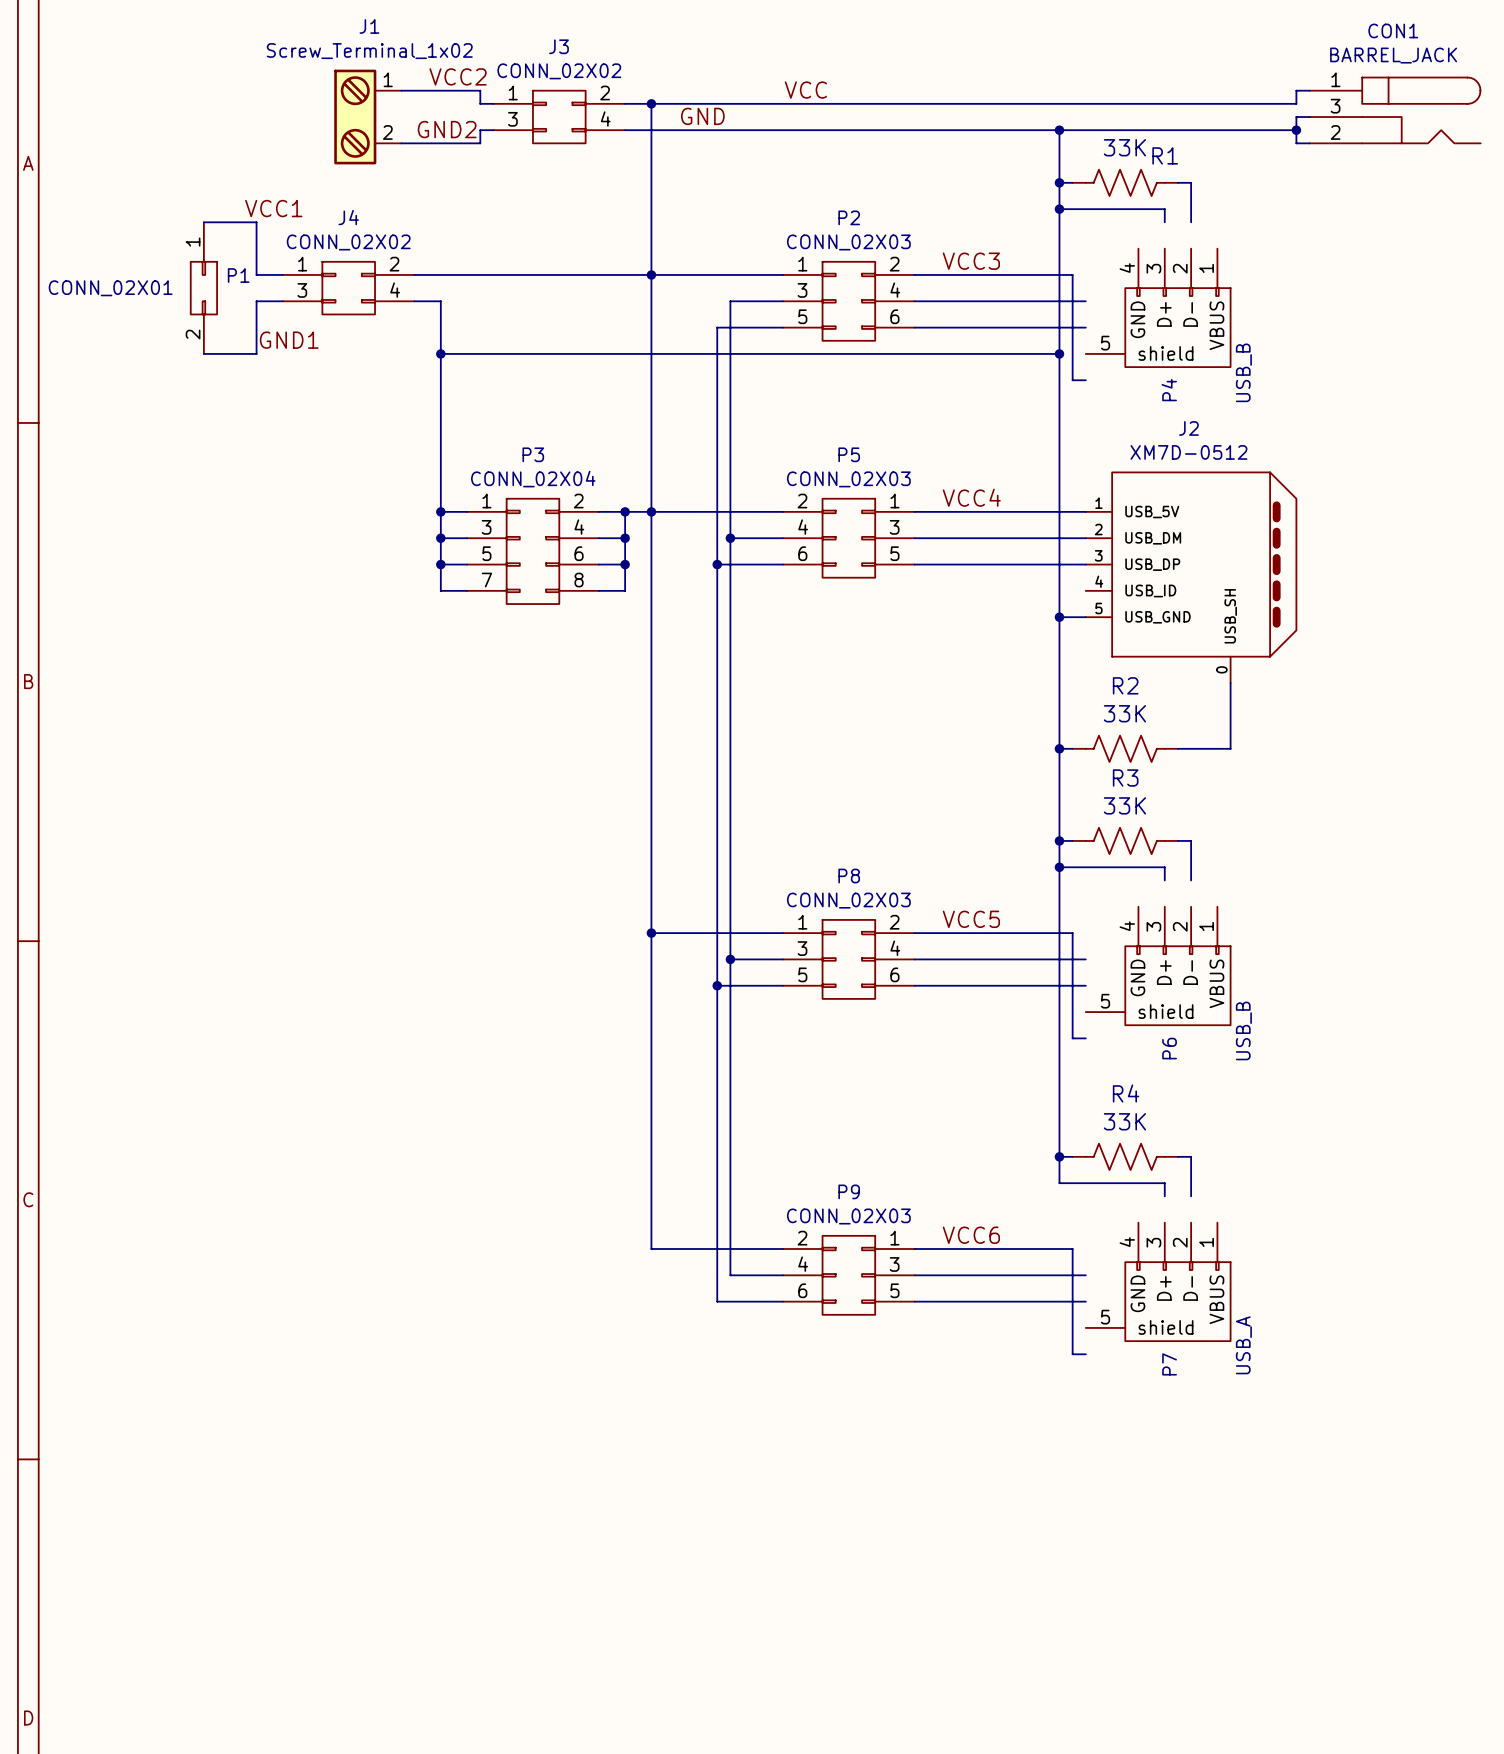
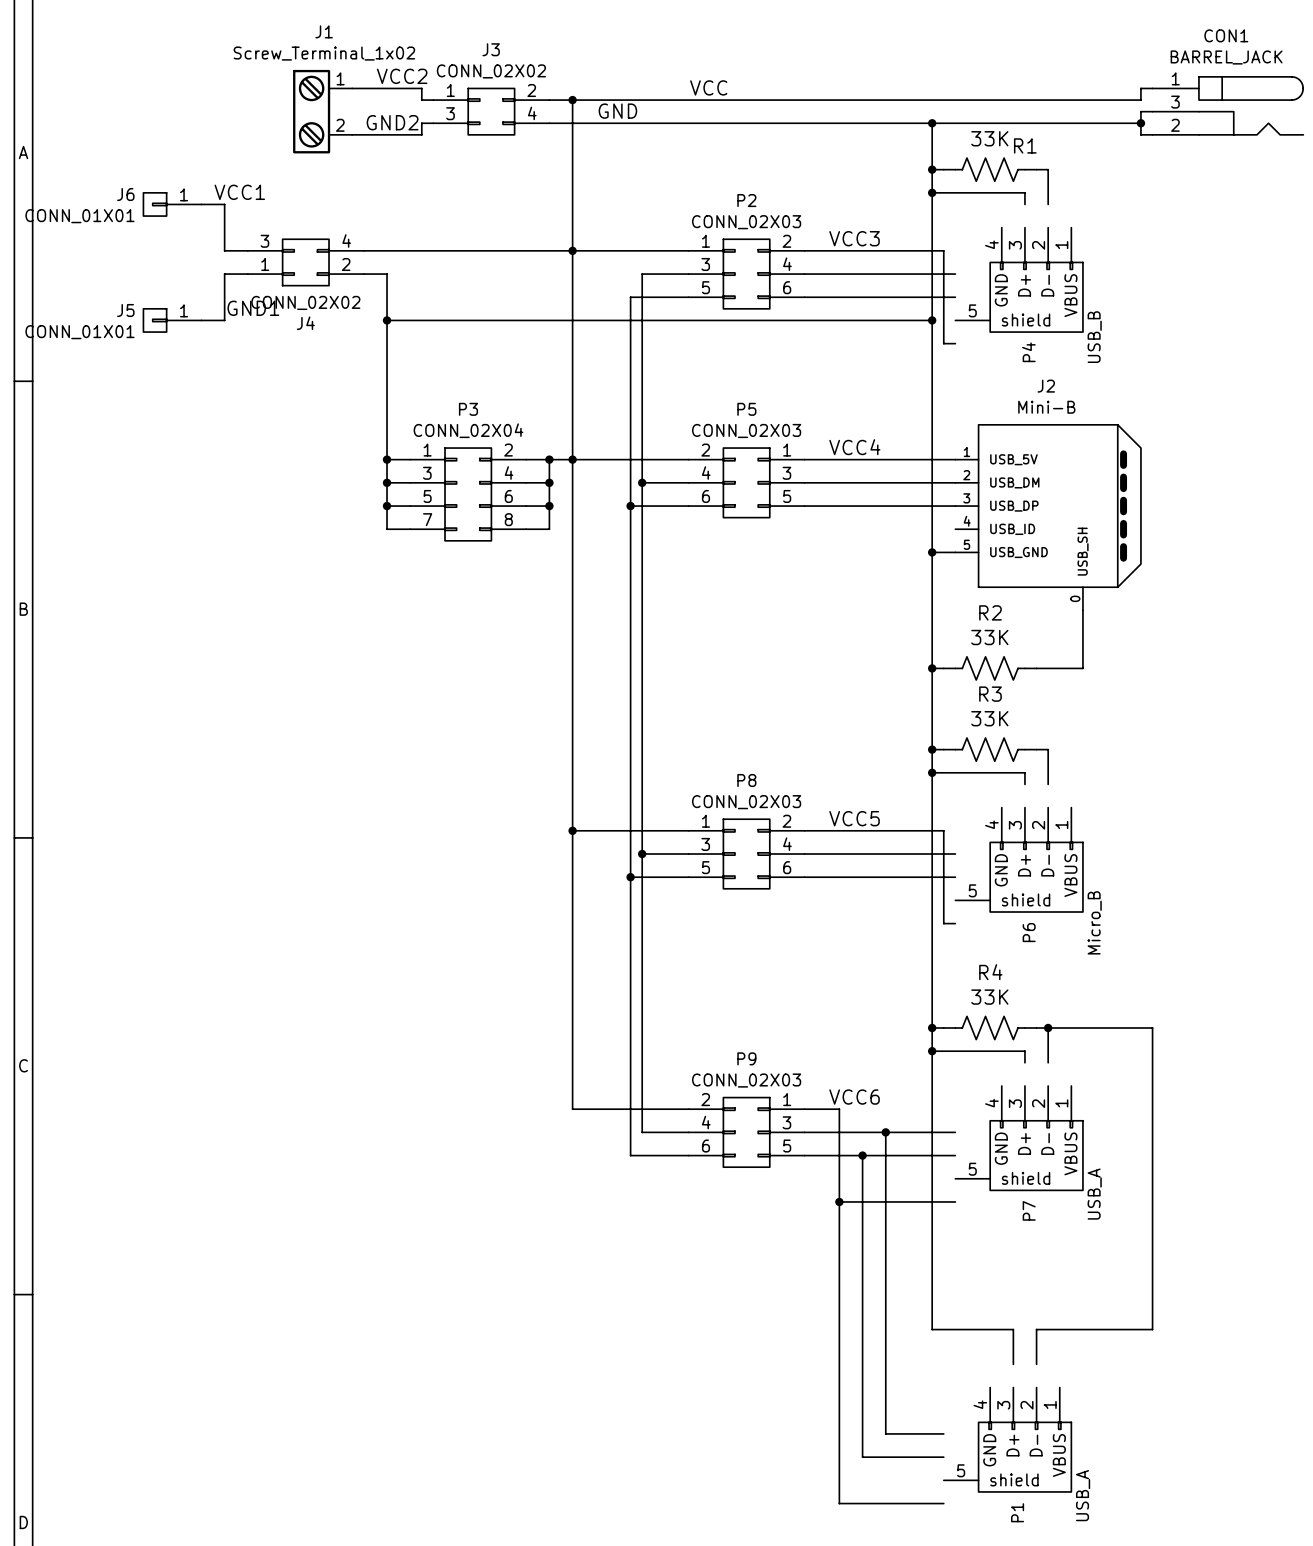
P1 symbol: [190, 222, 218, 354] -> [943, 1387, 1072, 1492]
J6: none -> CONN_01X01 (172, 204)
P1 name position: P1 (238, 275) -> P1 (1017, 1512)
P1 value: CONN_02X01 (110, 288) -> USB_A (1083, 1495)
J4 flip: as is (348, 288) -> up-down (305, 262)
J5: none -> CONN_01X01 (172, 320)
J2 value: XM7D-0512 (1188, 452) -> Mini-B (1046, 407)
P6 value: USB_B (1243, 1030) -> Micro_B (1094, 922)
wire: none -> (1048, 1027) (1152, 1027) (1152, 1329) (1036, 1329) (1036, 1364)
junction: none -> (1048, 1027)
wire: none -> (932, 1051) (932, 1329) (1013, 1329) (1013, 1364)
junction: none -> (932, 1051)
wire: (954, 1249) (1072, 1249) (1072, 1354) -> (839, 1201) (943, 1201)
wire: none -> (839, 1109) (839, 1503) (943, 1503)
wire: none -> (885, 1132) (885, 1433) (943, 1433)
junction: none -> (885, 1132)
wire: none -> (862, 1155) (862, 1457) (943, 1457)
junction: none -> (862, 1155)
junction: none -> (839, 1201)

